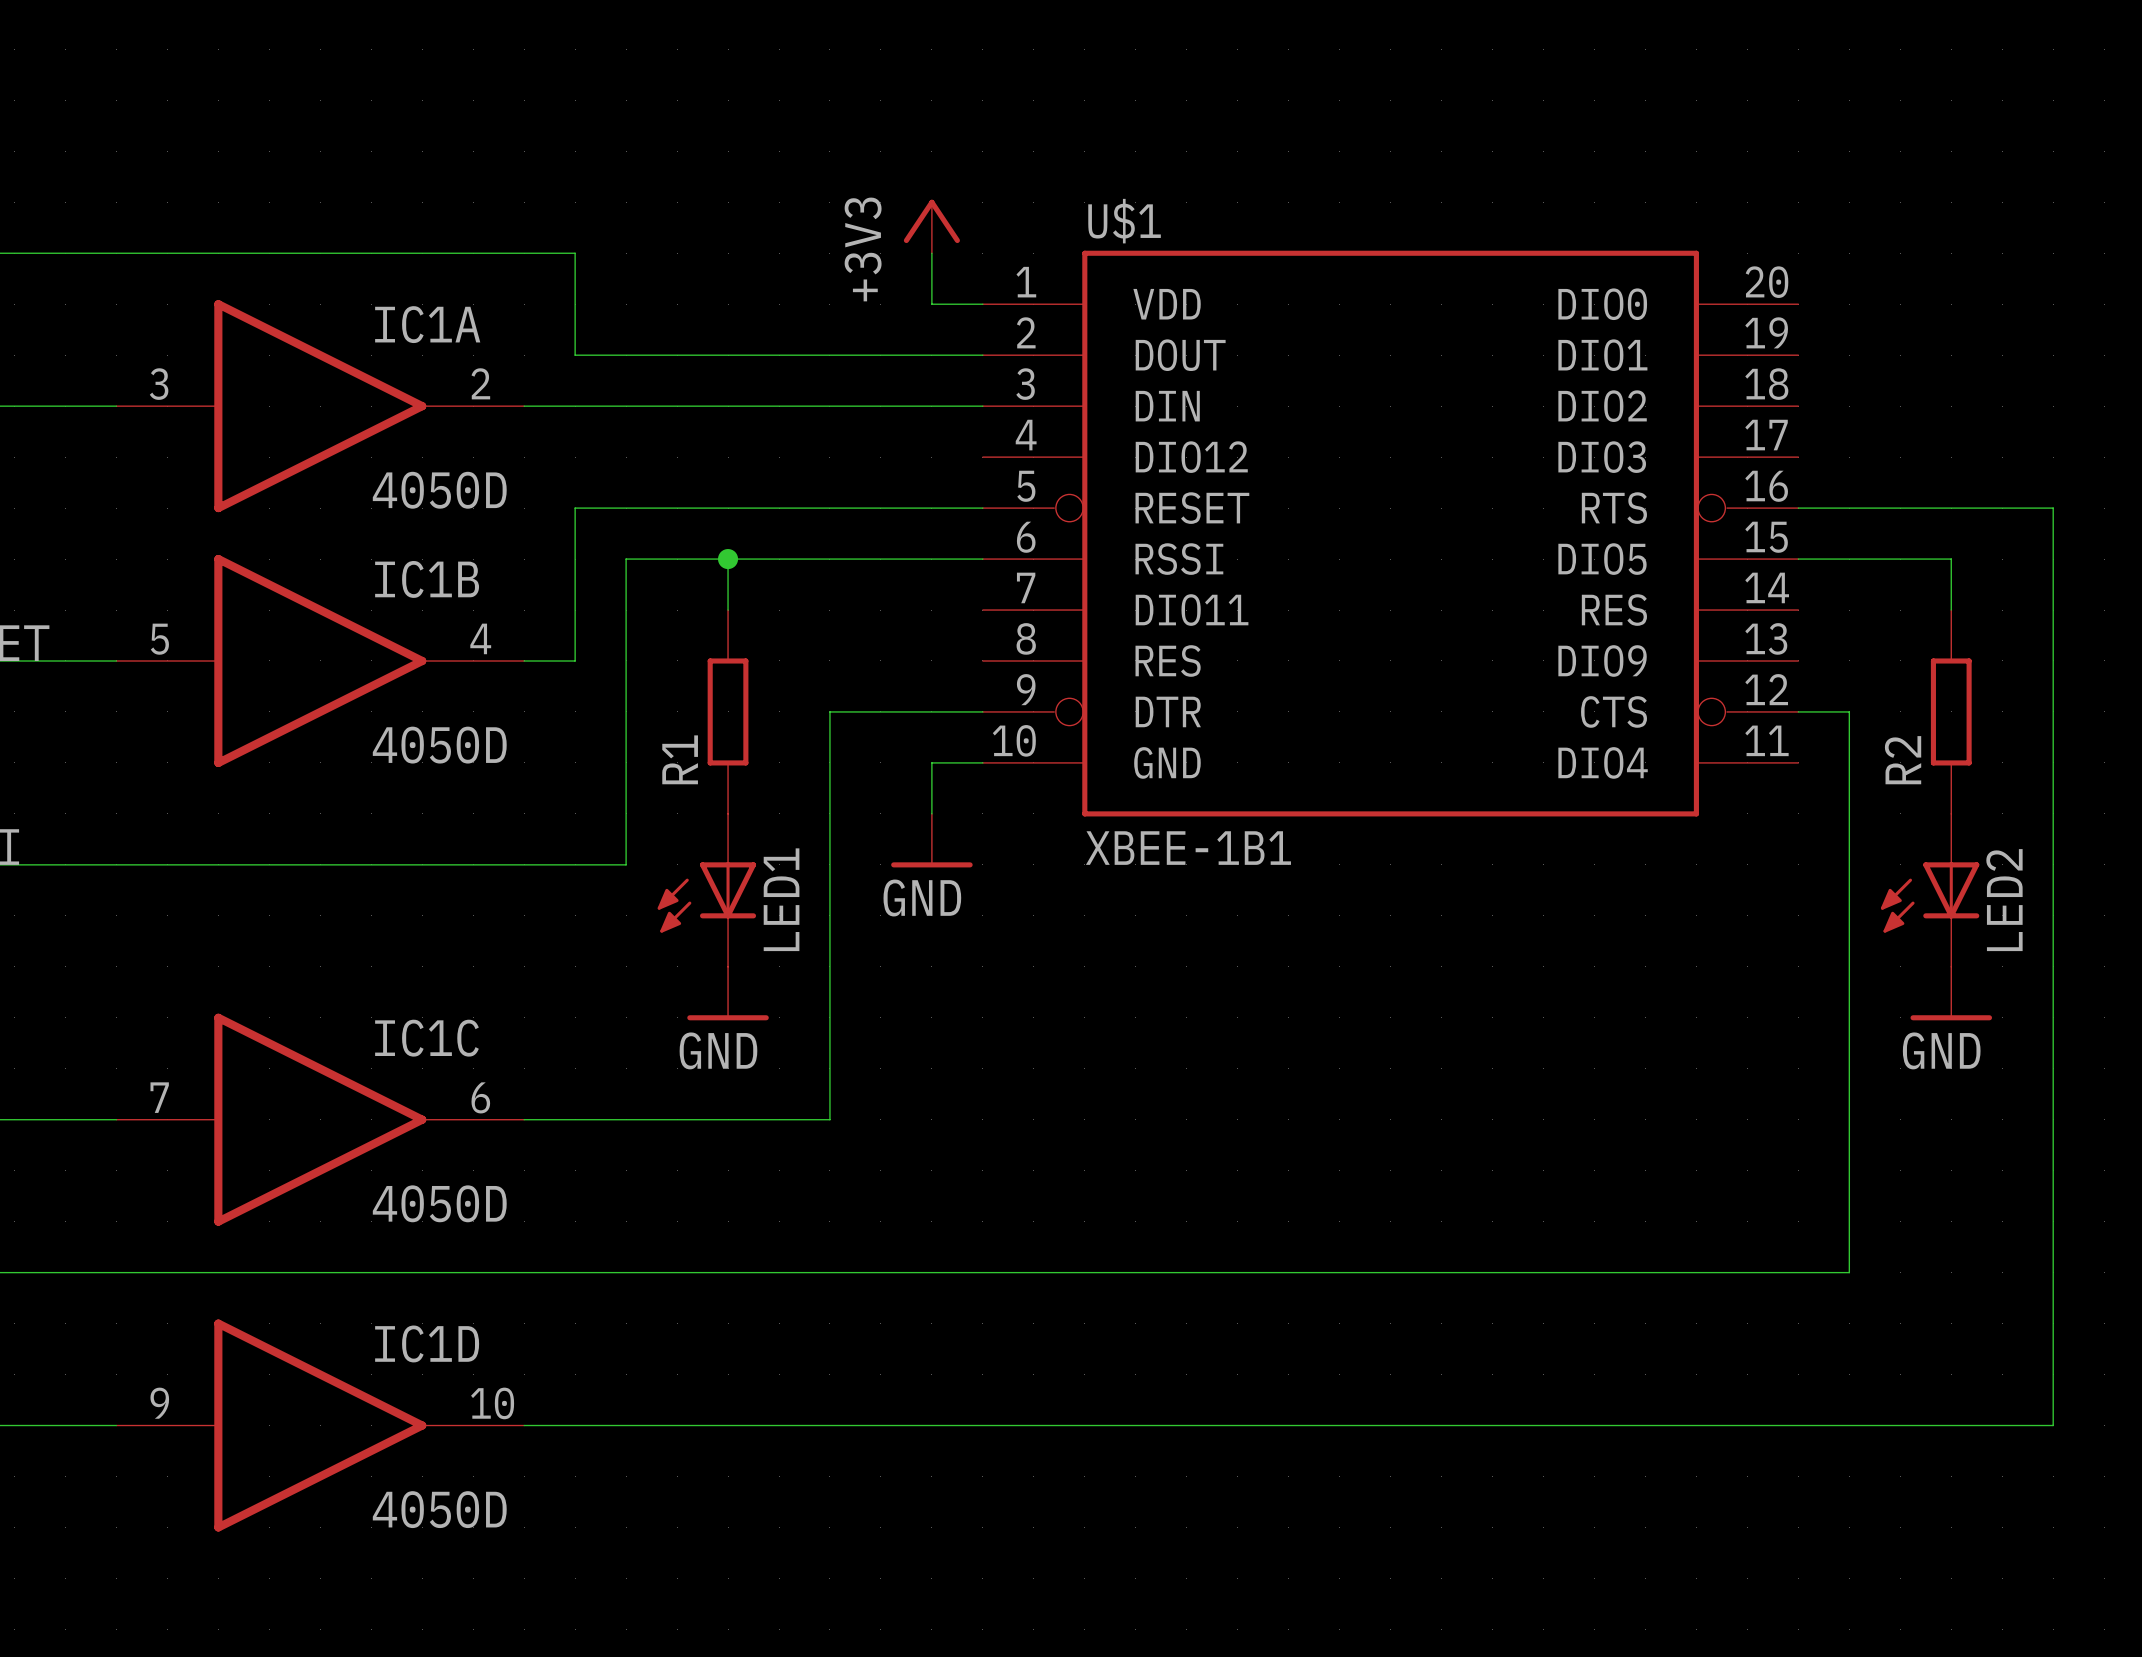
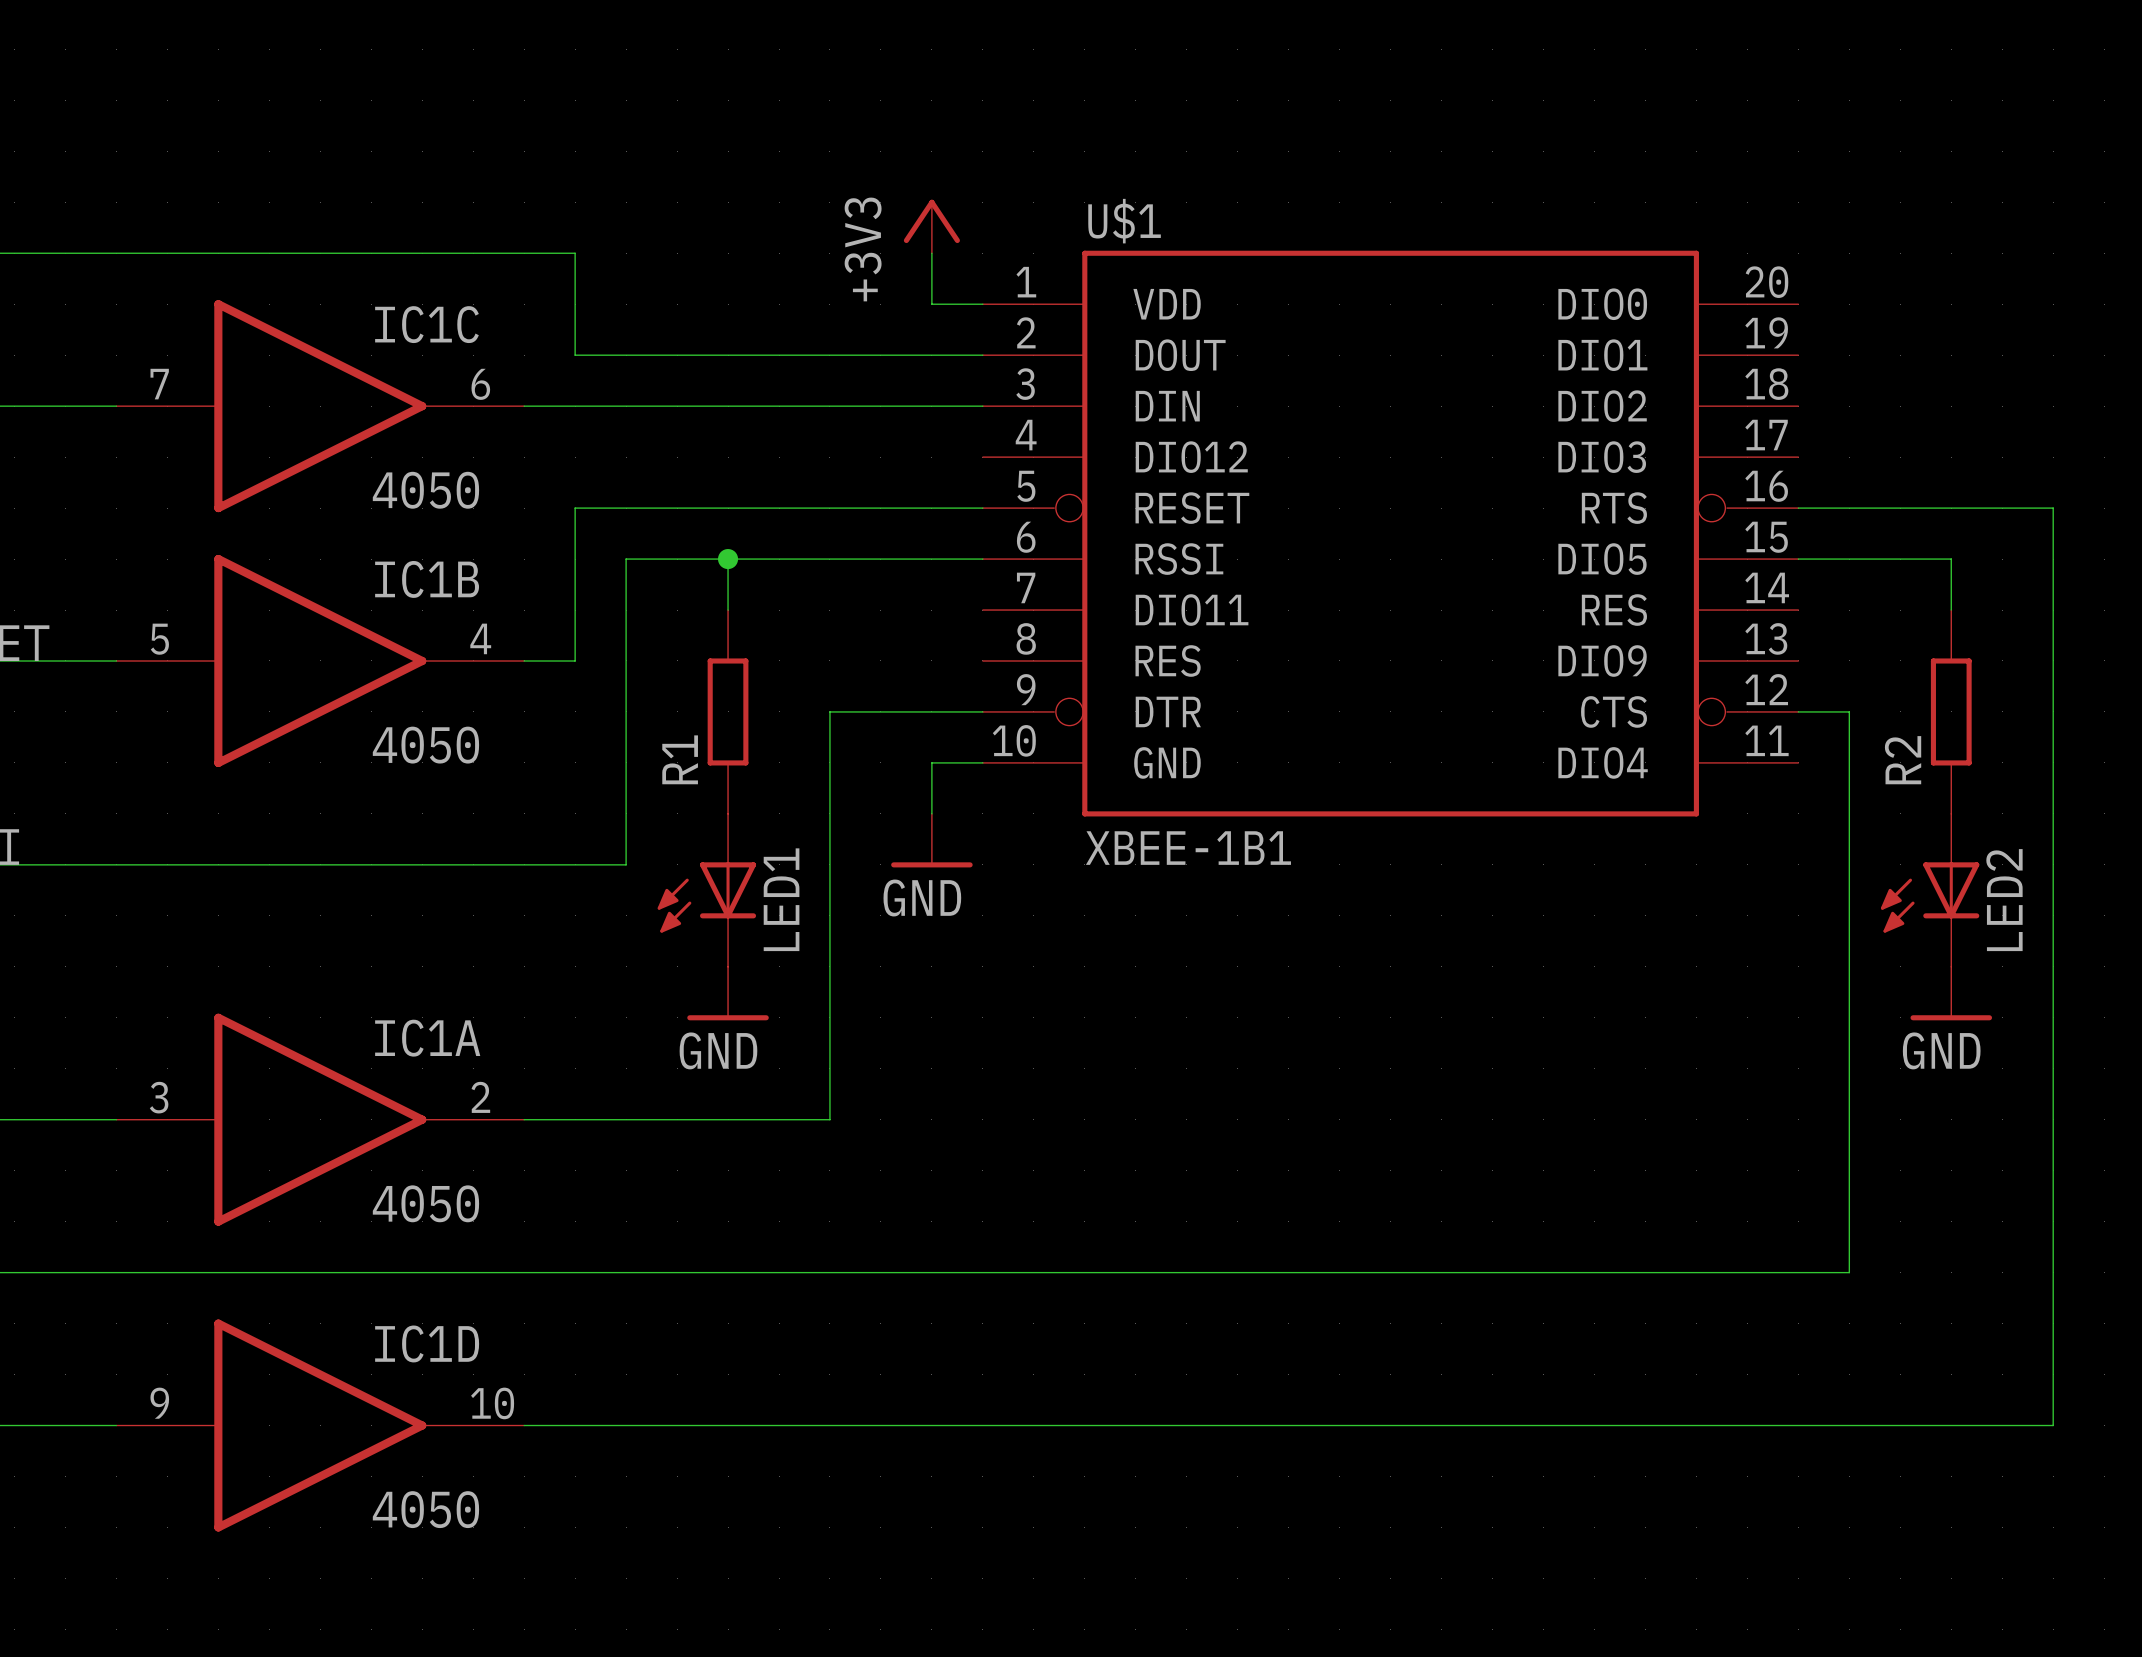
IC1A position: (320, 406) -> (320, 1119)
IC1A value: 4050D (439, 490) -> 4050 (425, 1203)
IC1B value: 4050D (439, 745) -> 4050 (425, 745)
IC1C position: (320, 1119) -> (320, 406)
IC1C value: 4050D (439, 1203) -> 4050 (425, 490)
IC1D value: 4050D (439, 1509) -> 4050 (425, 1509)

